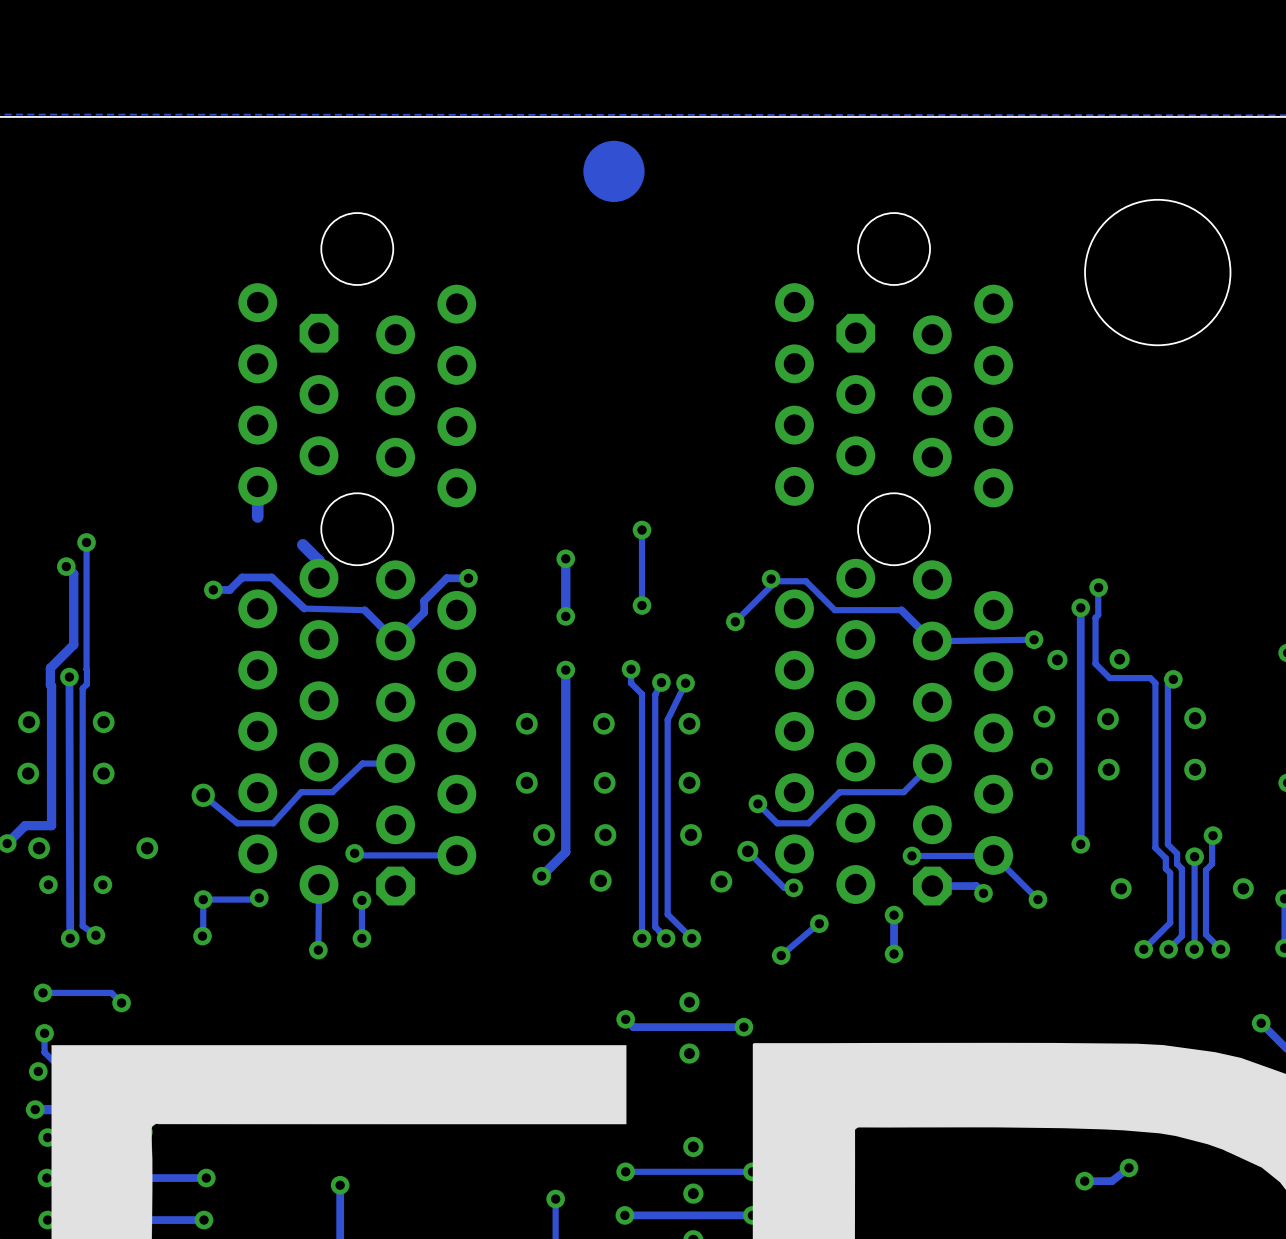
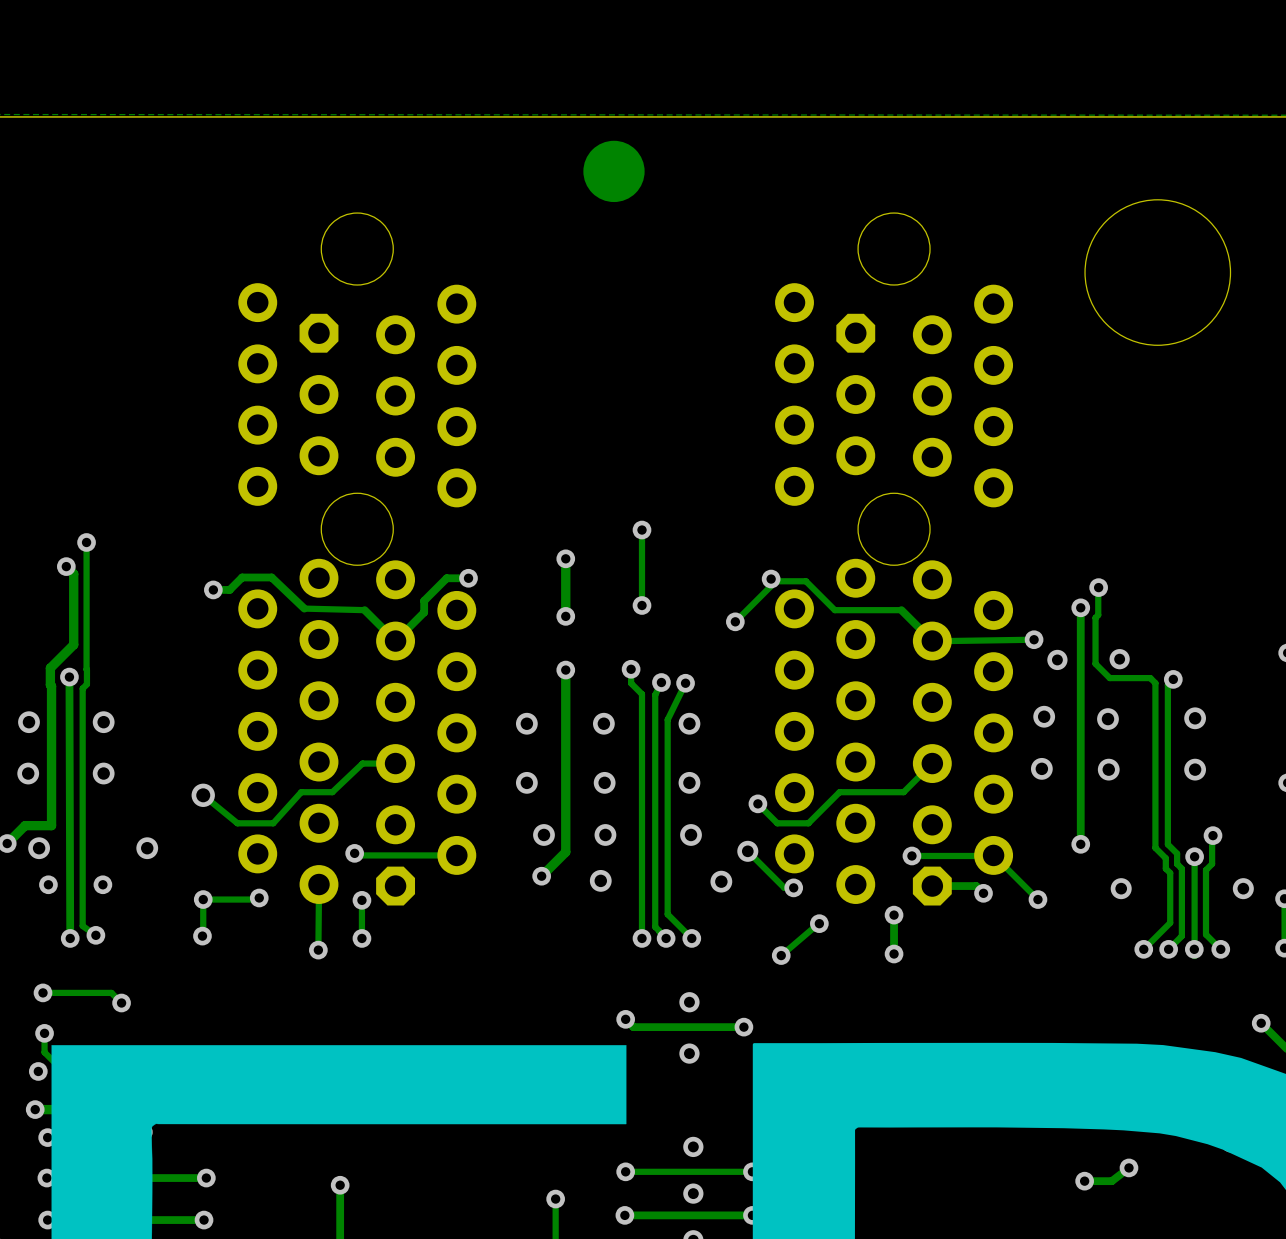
track: (257, 486) (257, 517) -> none
track: (302, 544) (318, 560) (318, 578) -> none

